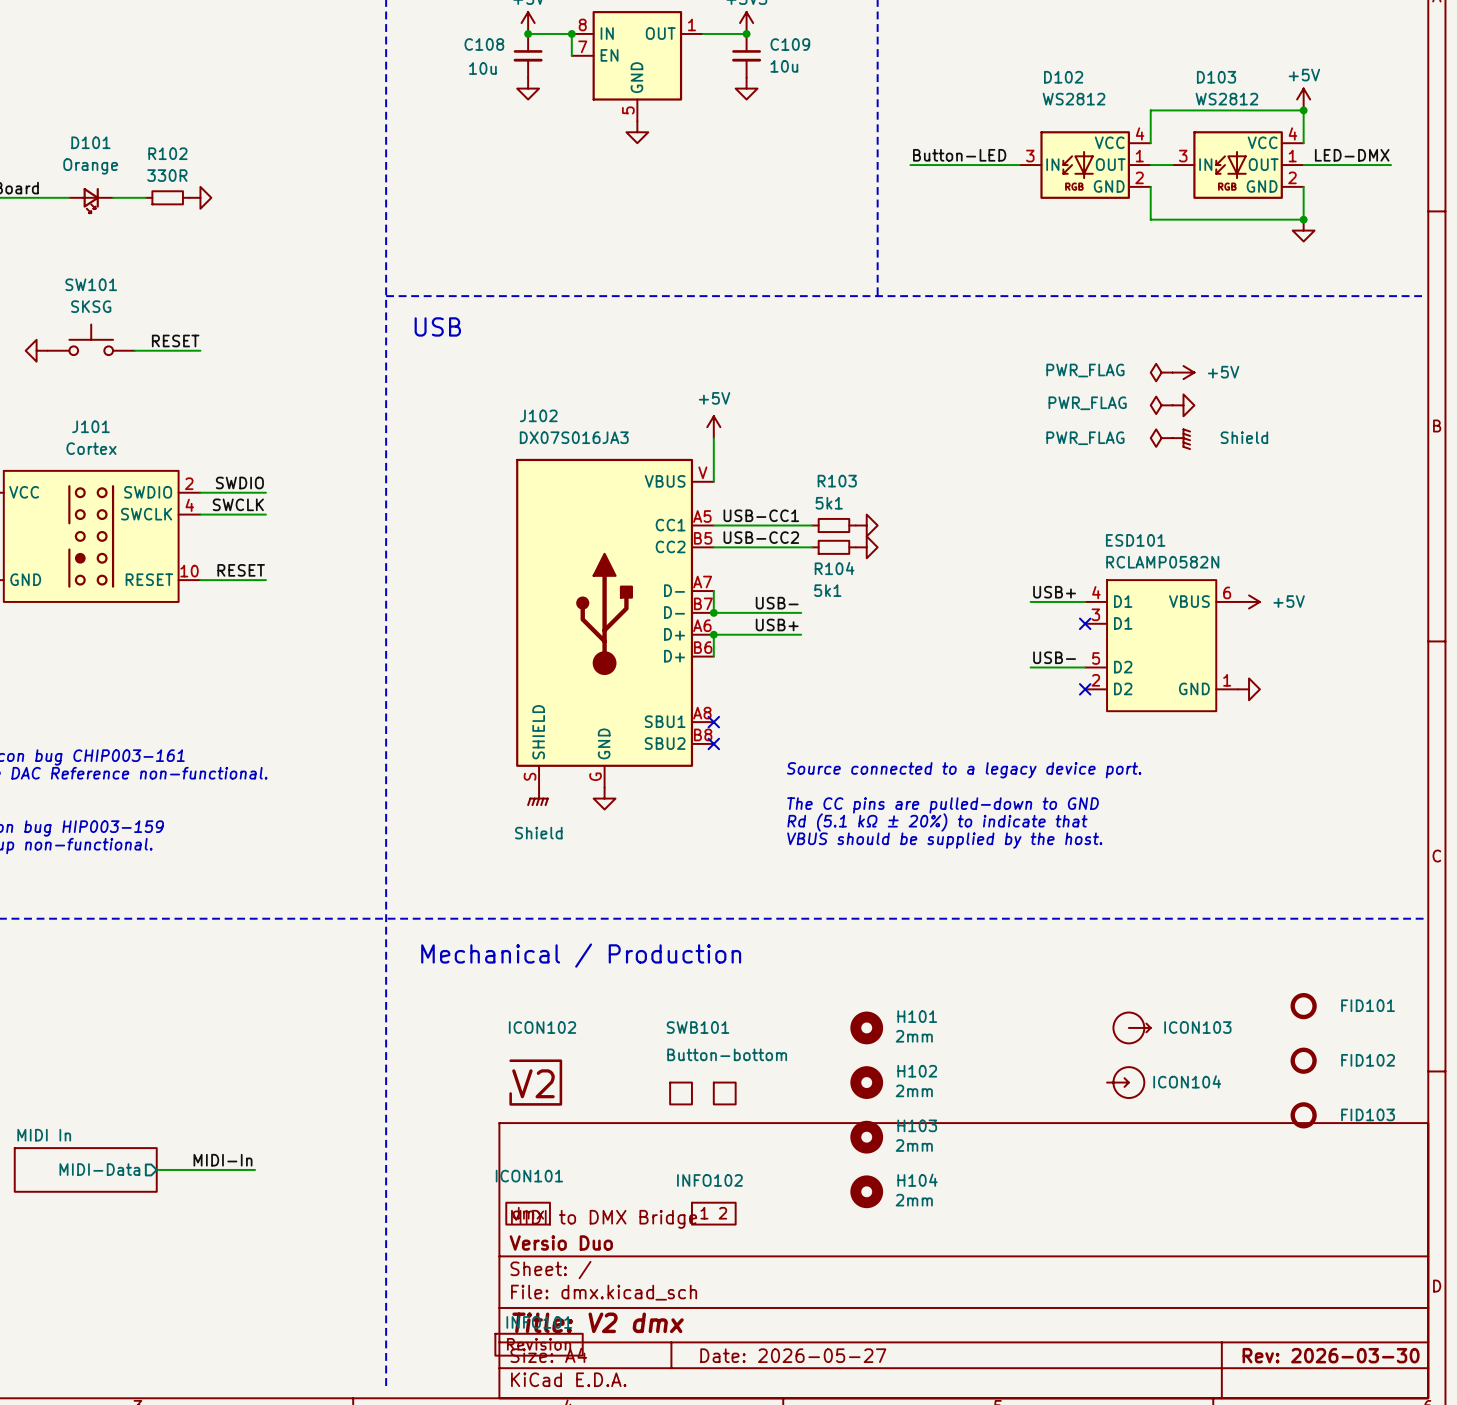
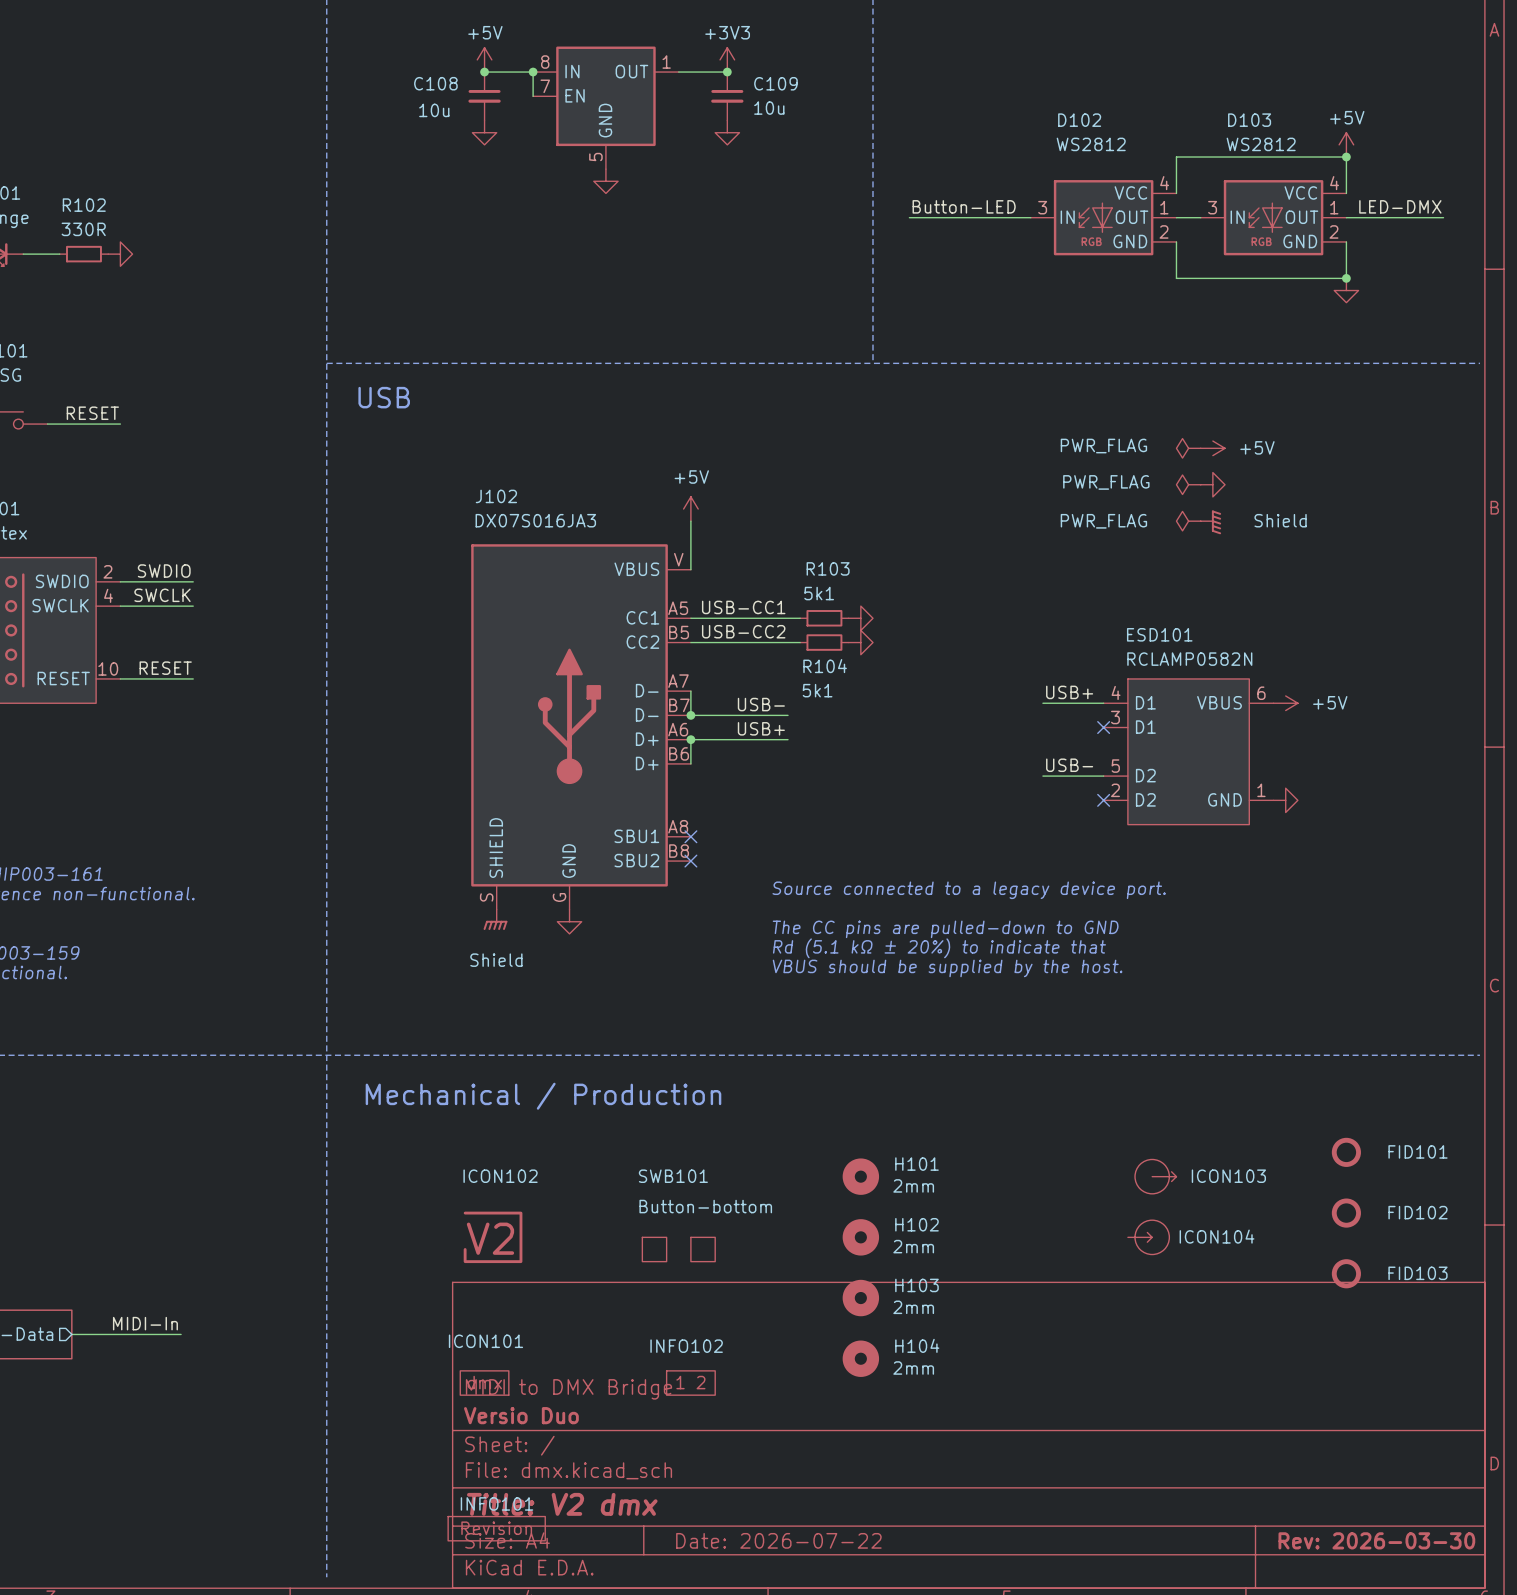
title block: Date: 2026-05-27 (793, 1355) -> Date: 2026-07-22 (778, 1540)

